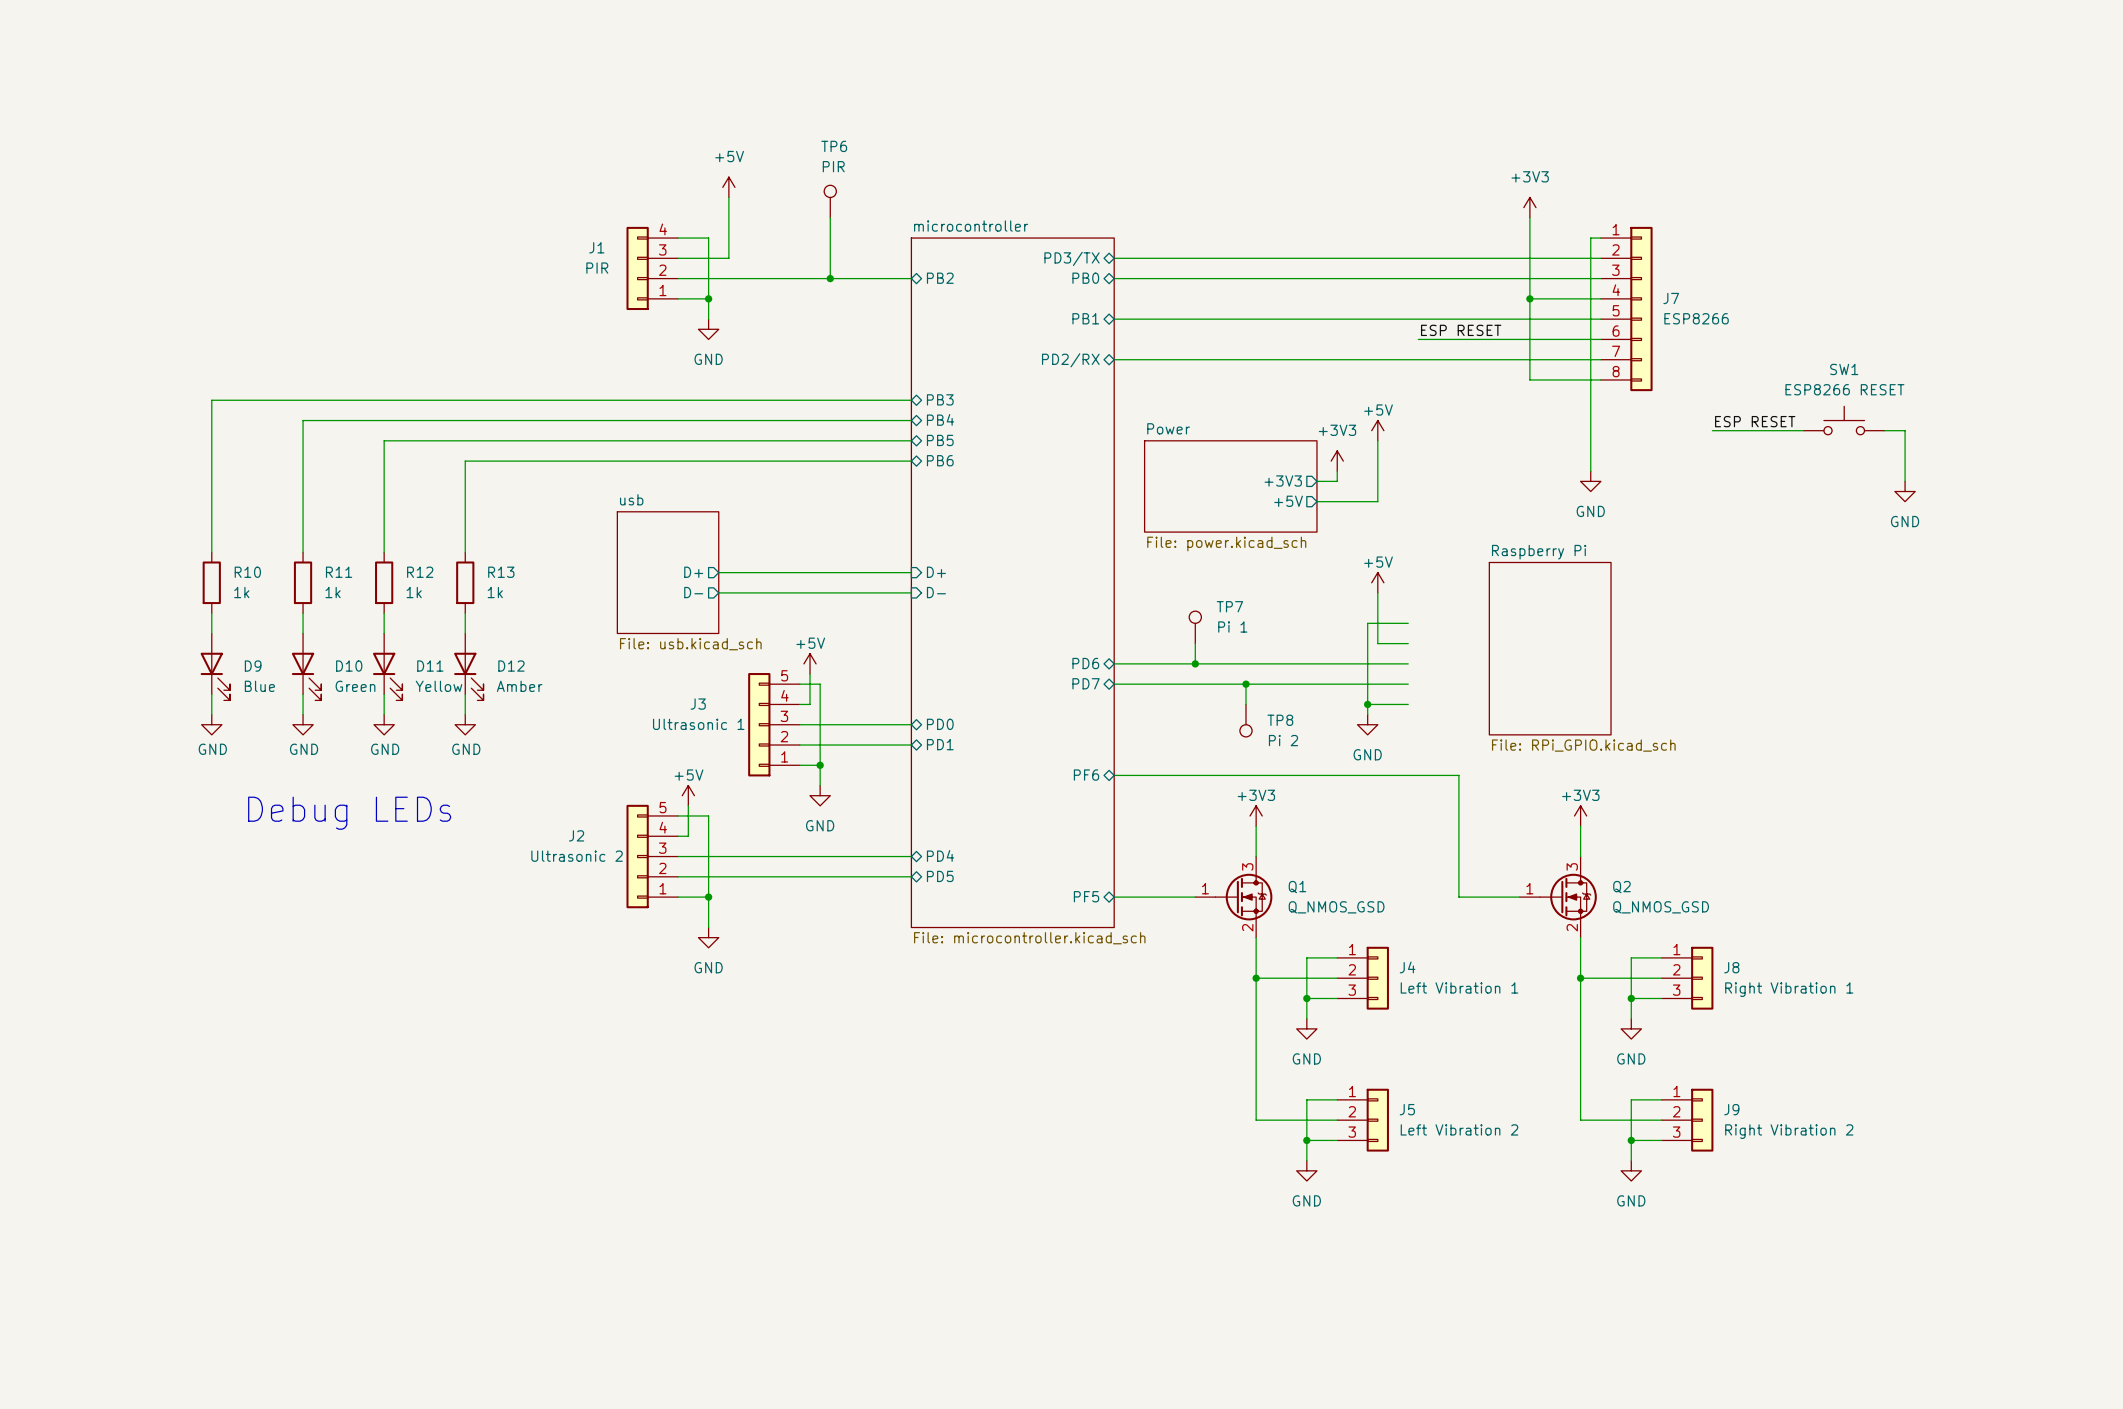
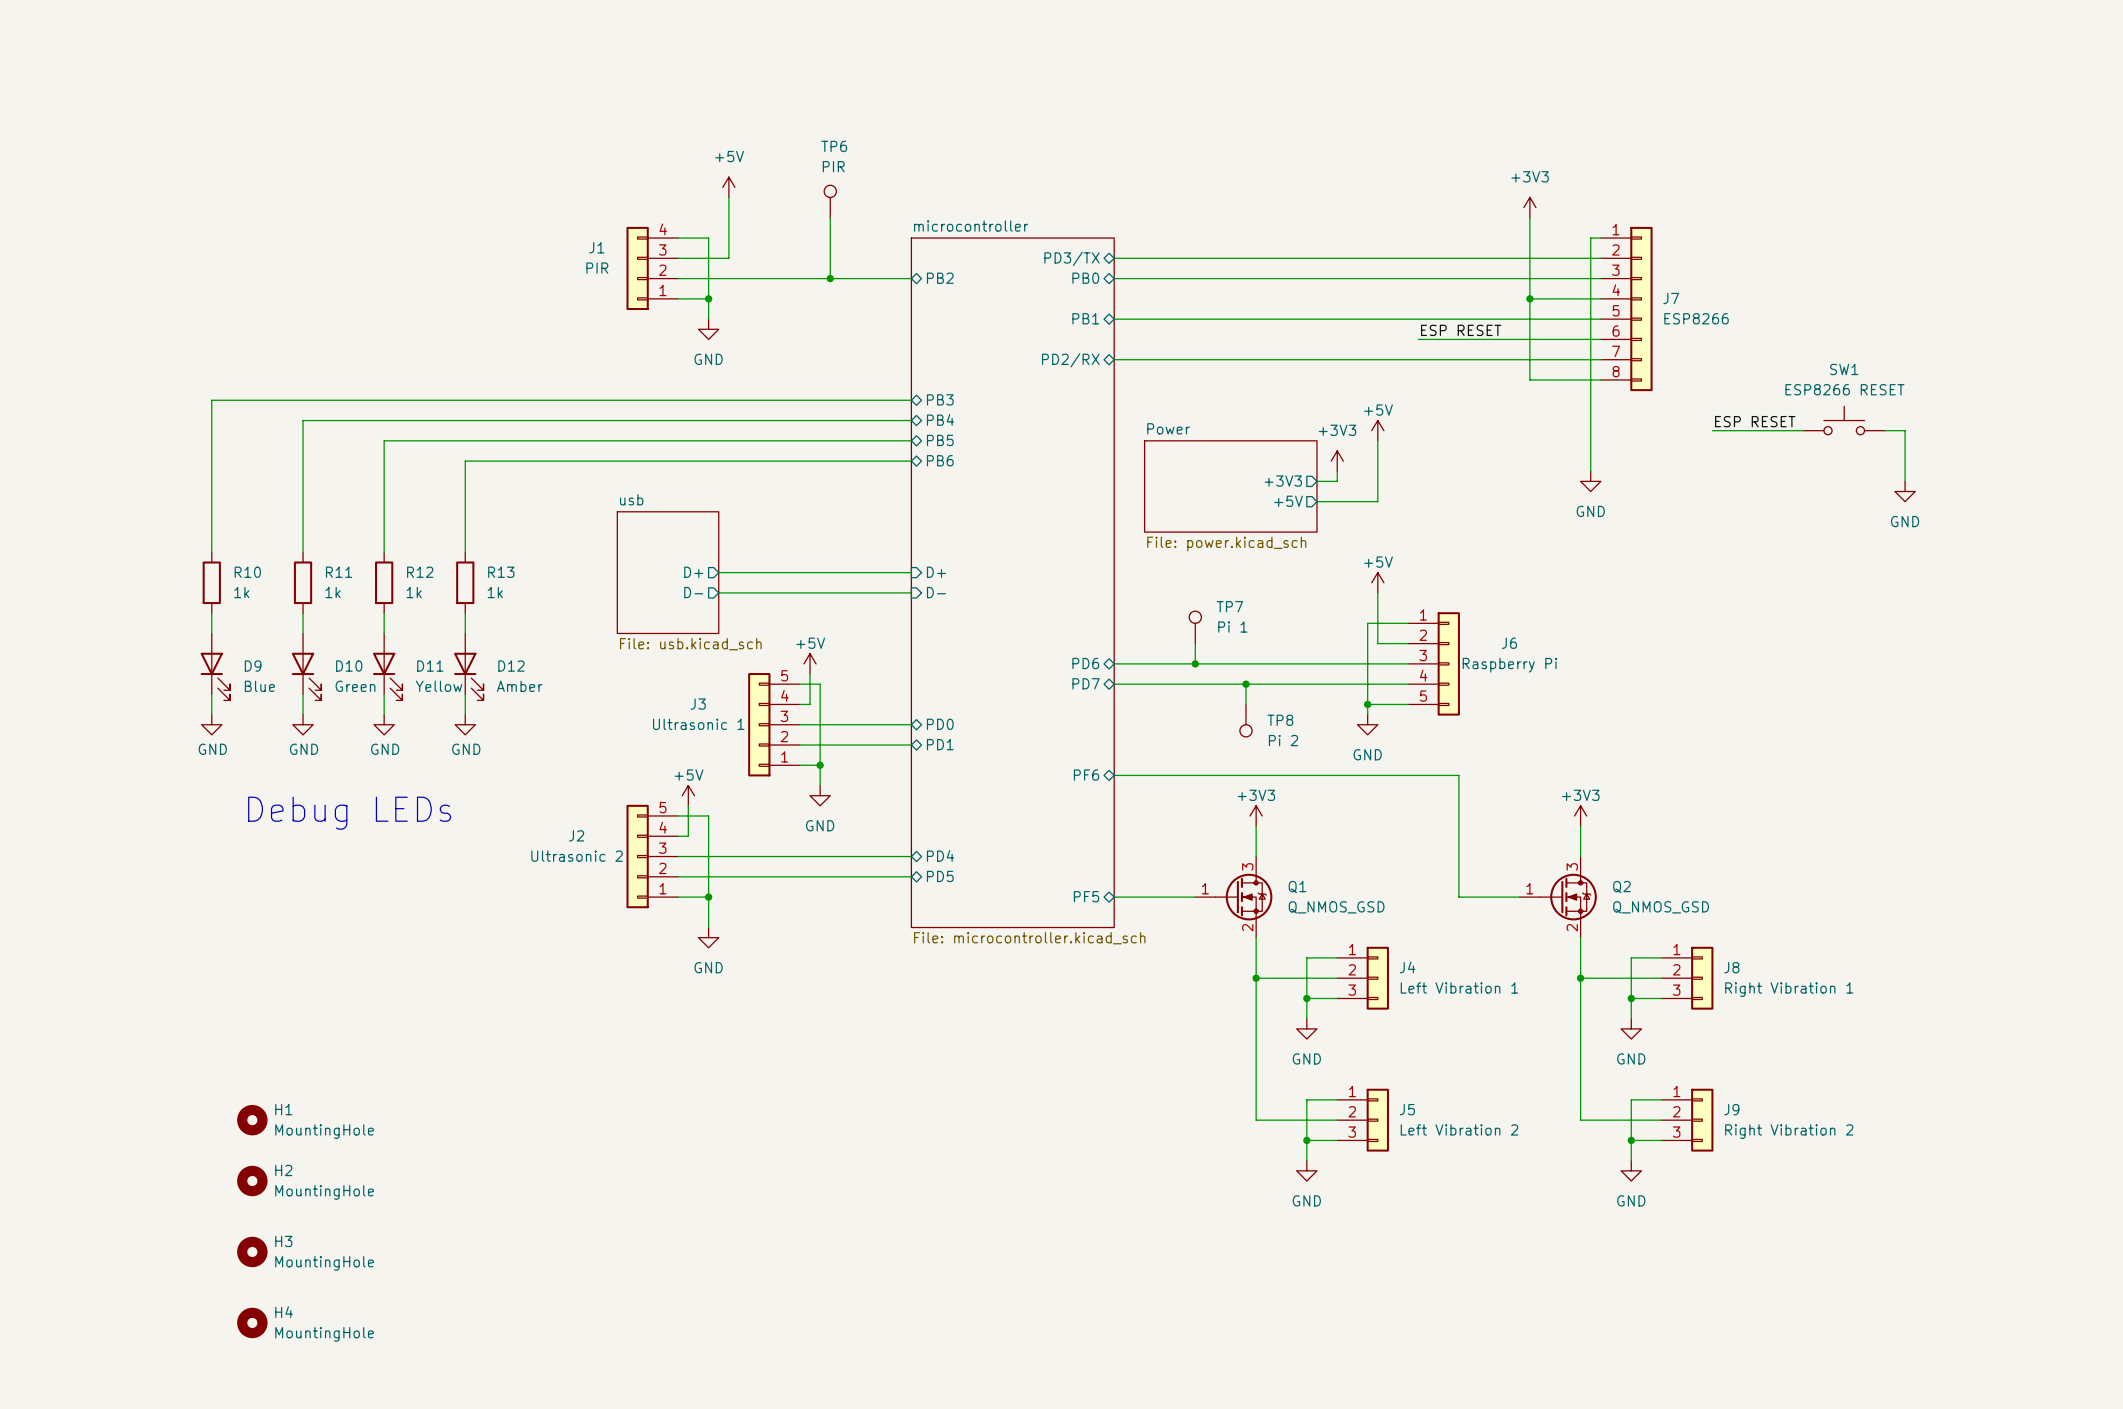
sheet Raspberry Pi: File: RPi_GPIO.kicad_sch (1550, 648) -> none
J6: none -> Raspberry Pi (1434, 663)
H1: none -> MountingHole (252, 1120)
H2: none -> MountingHole (252, 1181)
H3: none -> MountingHole (252, 1251)
H4: none -> MountingHole (252, 1322)

